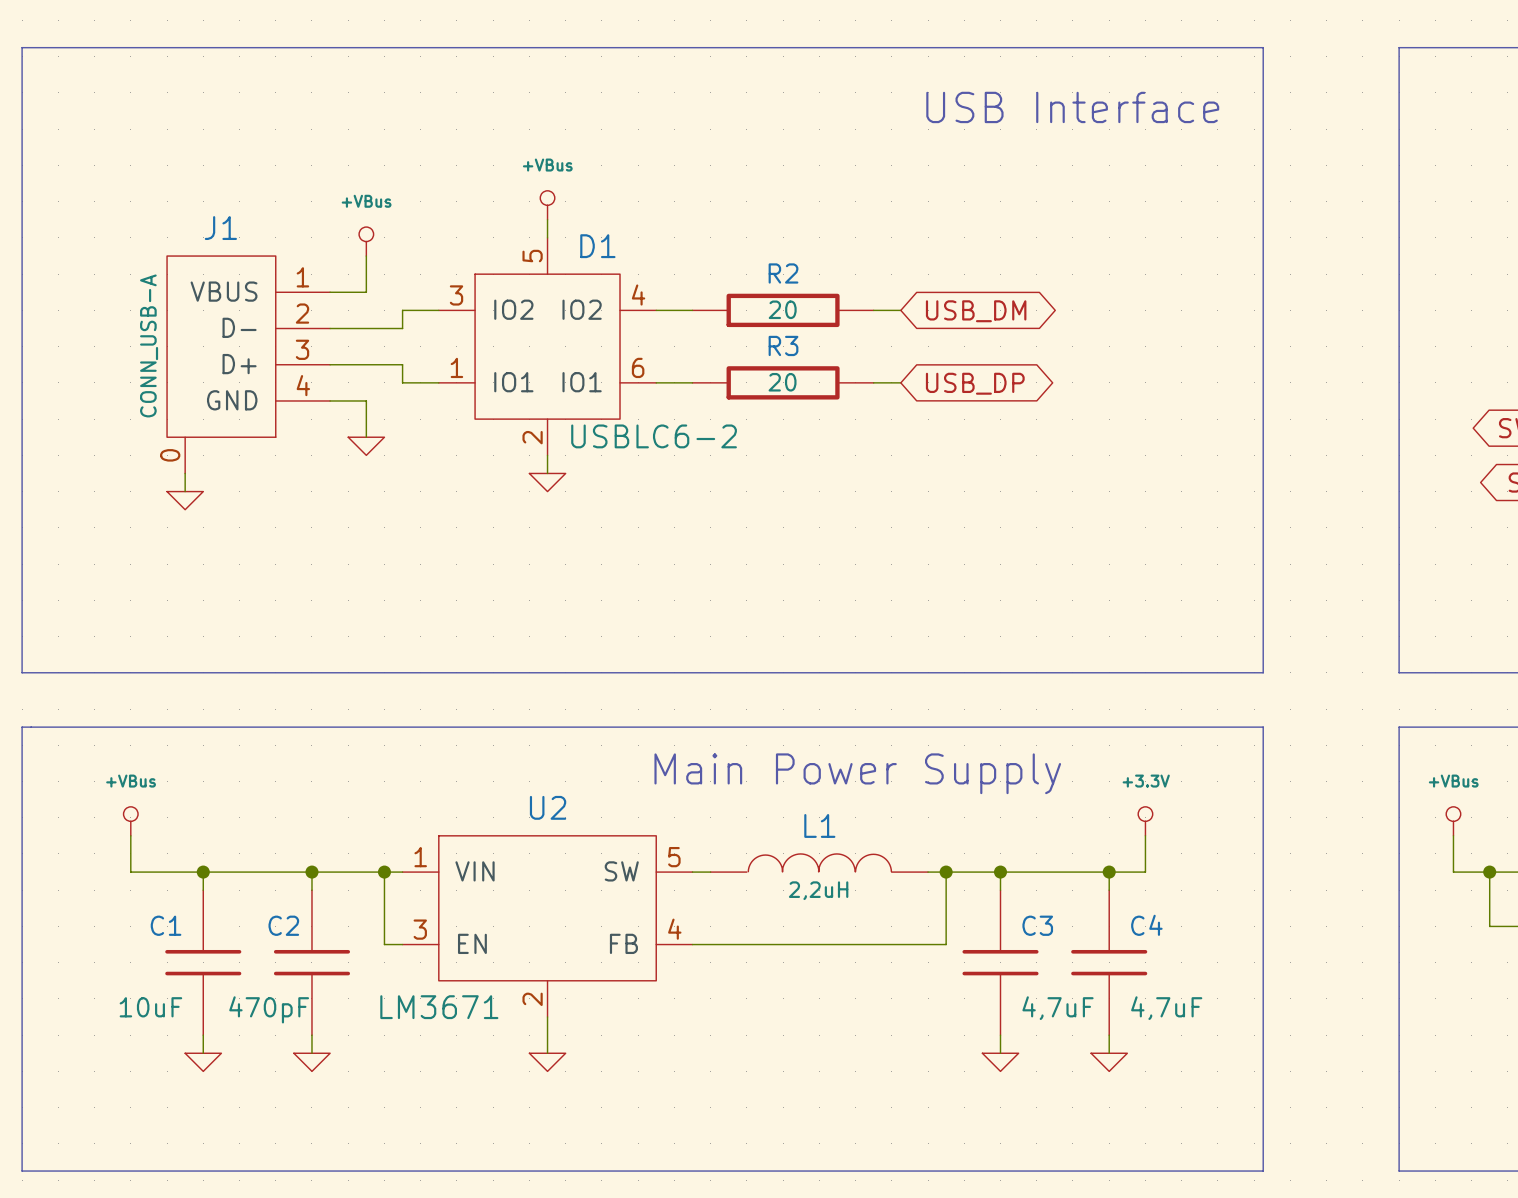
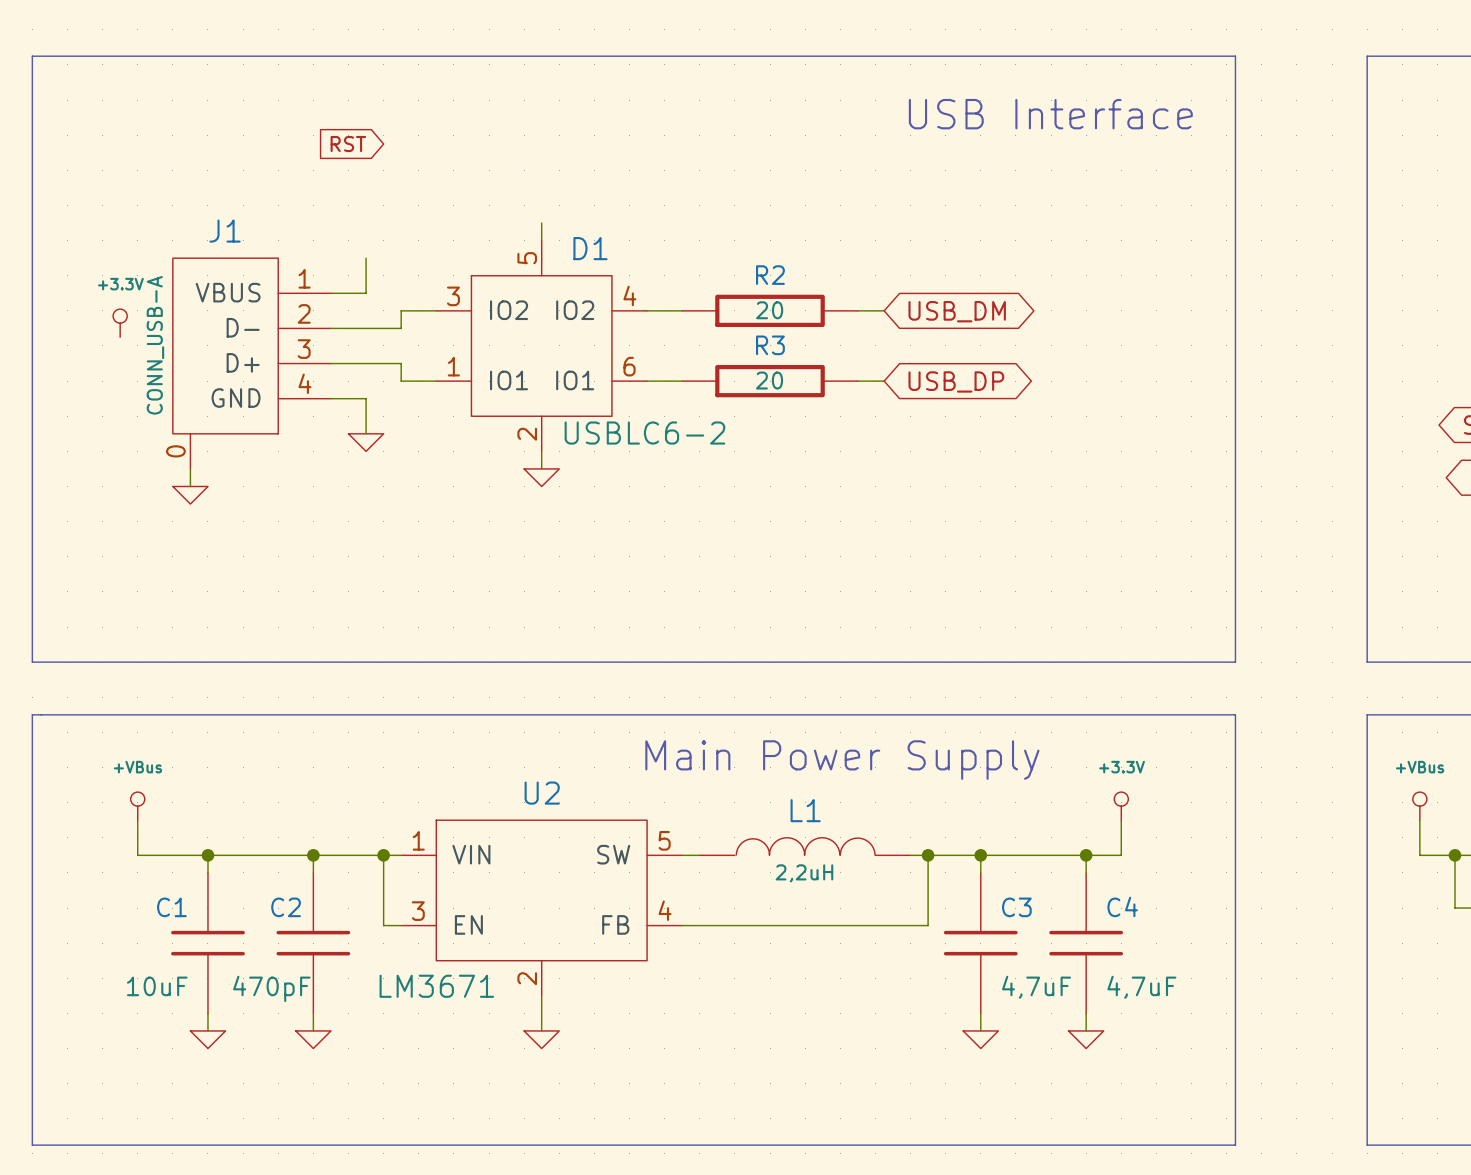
global label: none -> RST (348, 144)
power symbol: +VBus (547, 205) -> none
power symbol: +VBus (366, 241) -> none
power symbol: none -> +3.3V (120, 323)

